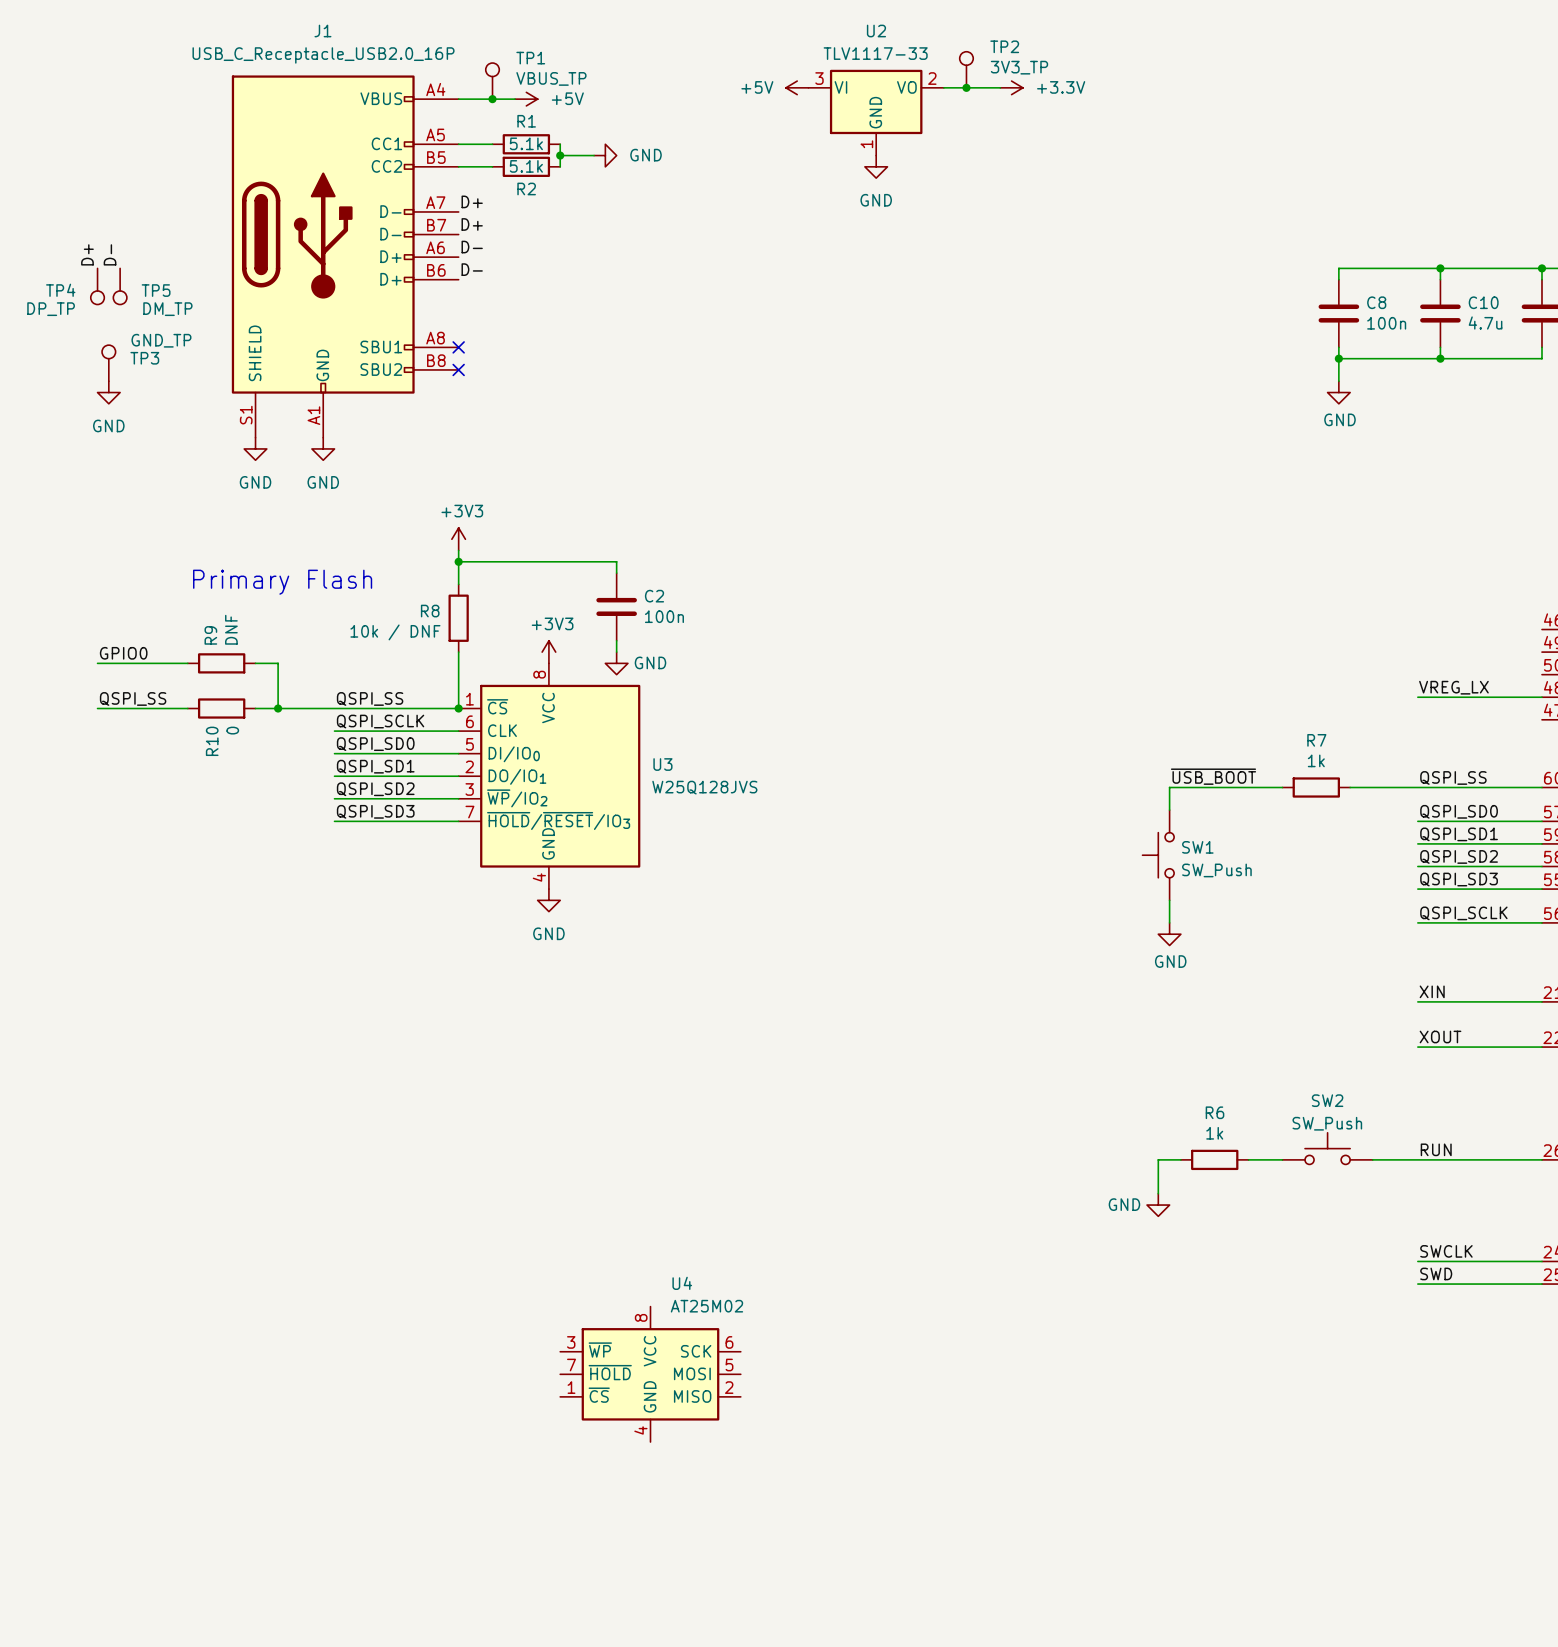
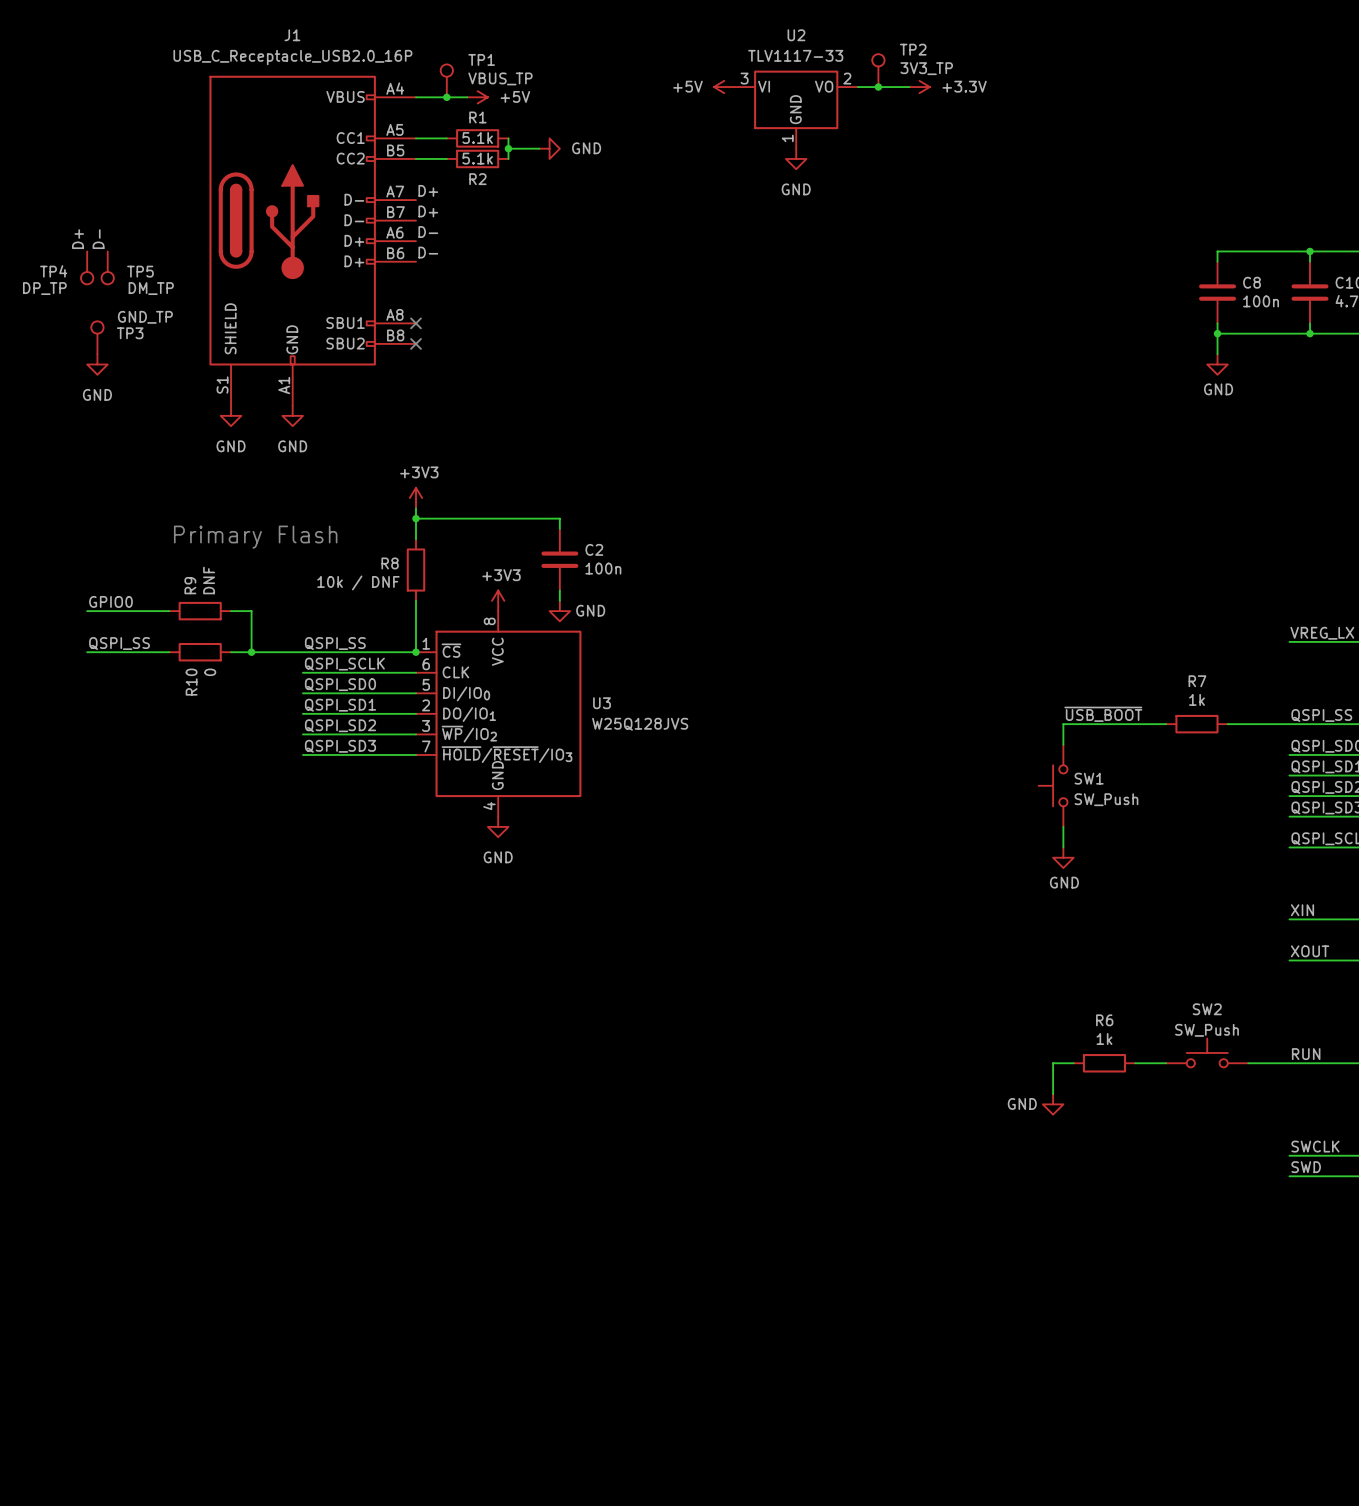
U4: AT25M02 (650, 1374) -> none

